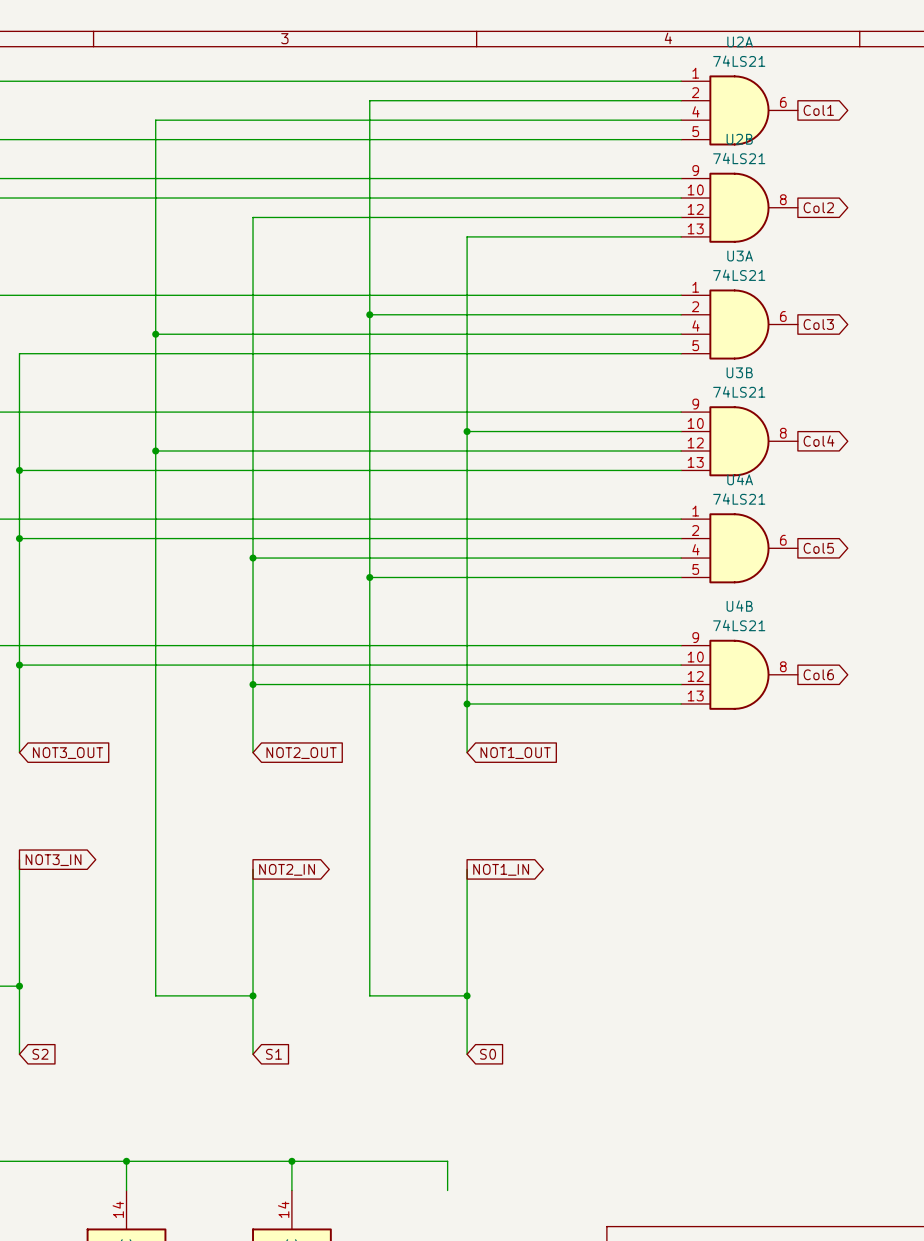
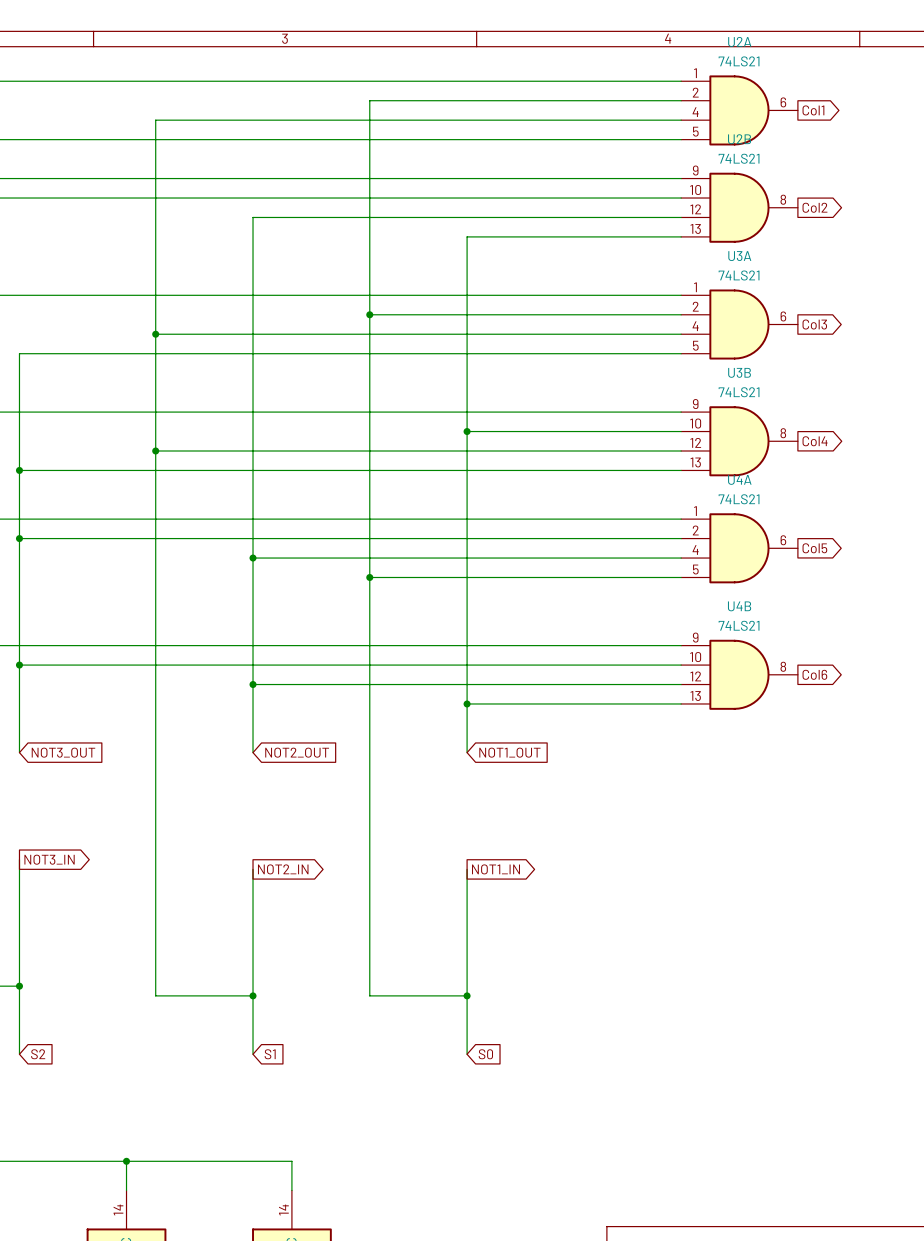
wire: (291, 1161) (447, 1161) (447, 1190) -> none
junction: (291, 1161) -> none

